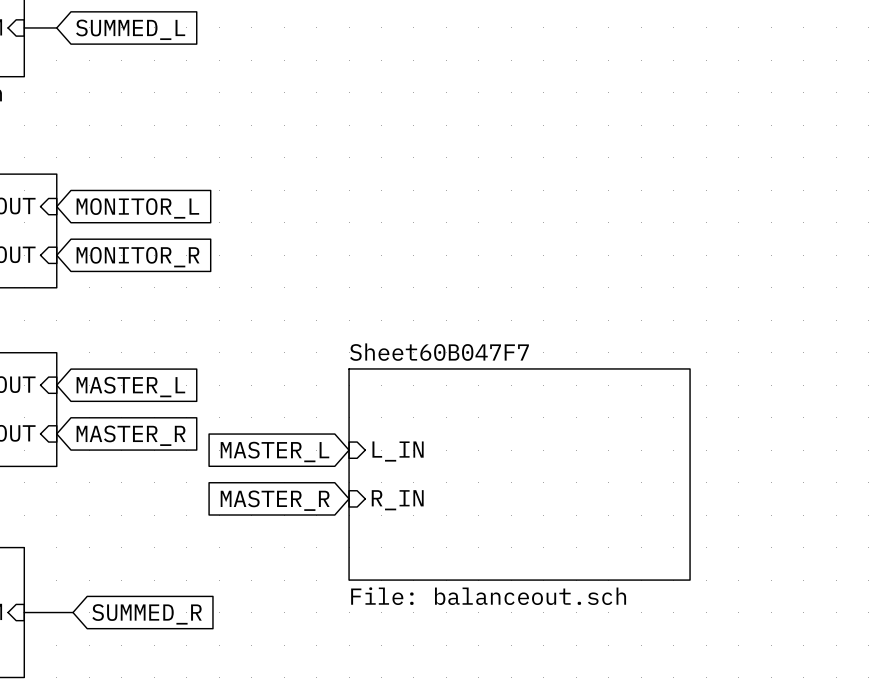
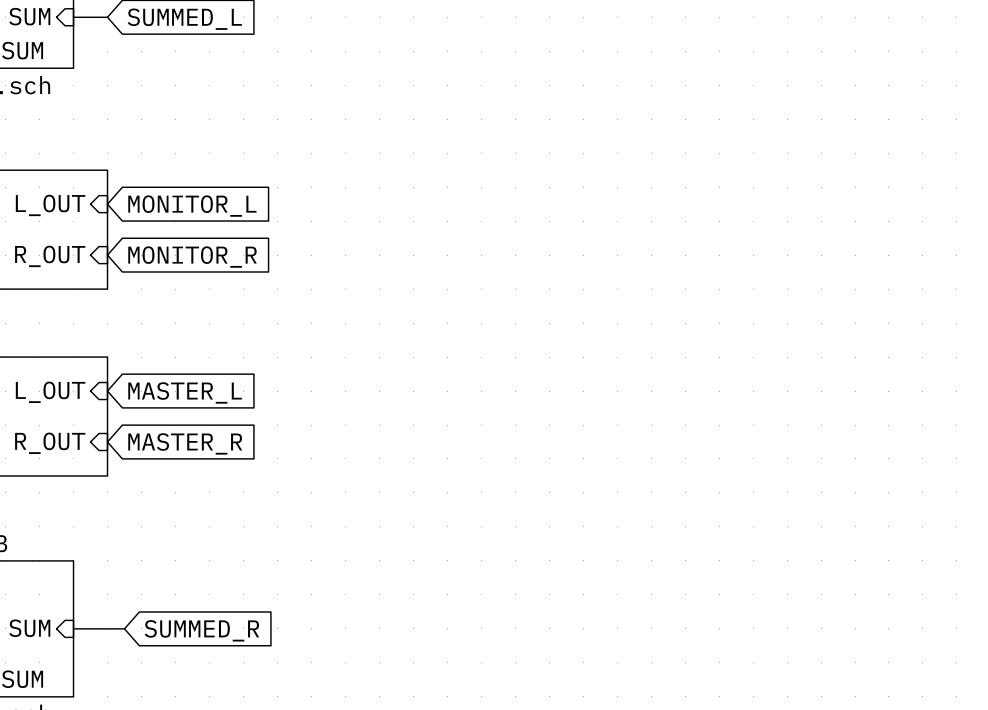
global label: MASTER_L (274, 451) -> none
sheet pin: L_IN (398, 451) -> none
sheet Sheet60B047F7: File: balanceout.sch (519, 474) -> none
global label: MASTER_R (275, 500) -> none
sheet pin: R_IN (397, 500) -> none

